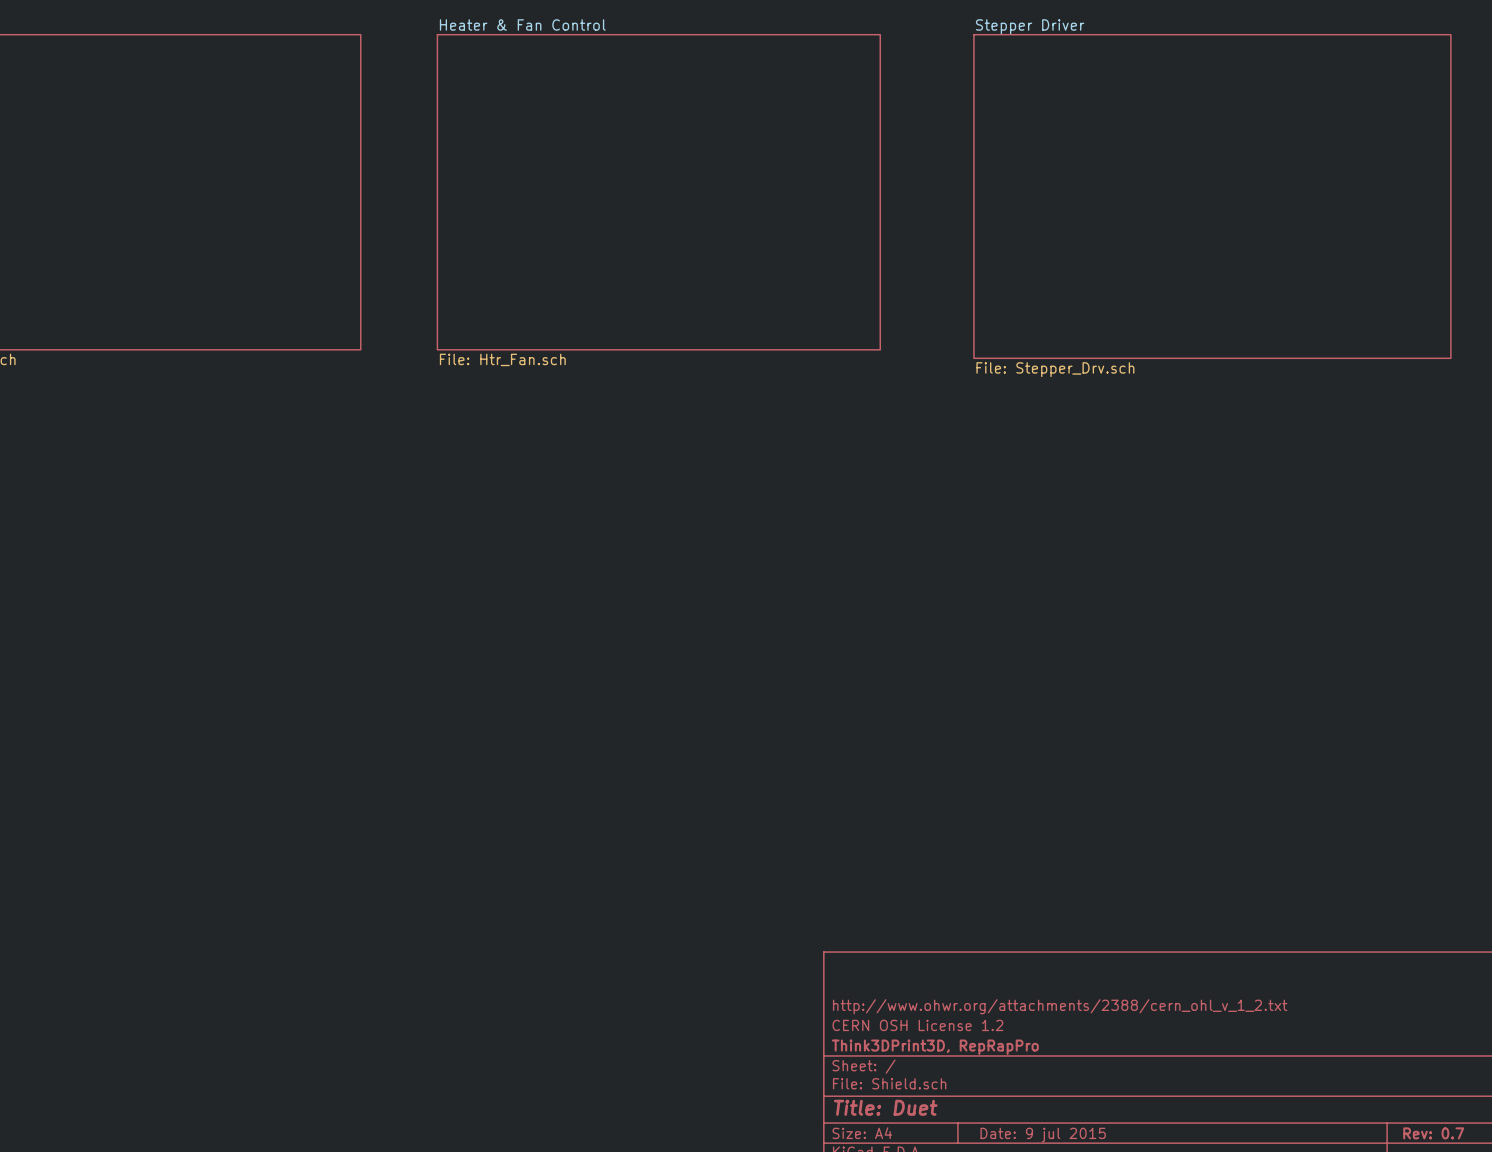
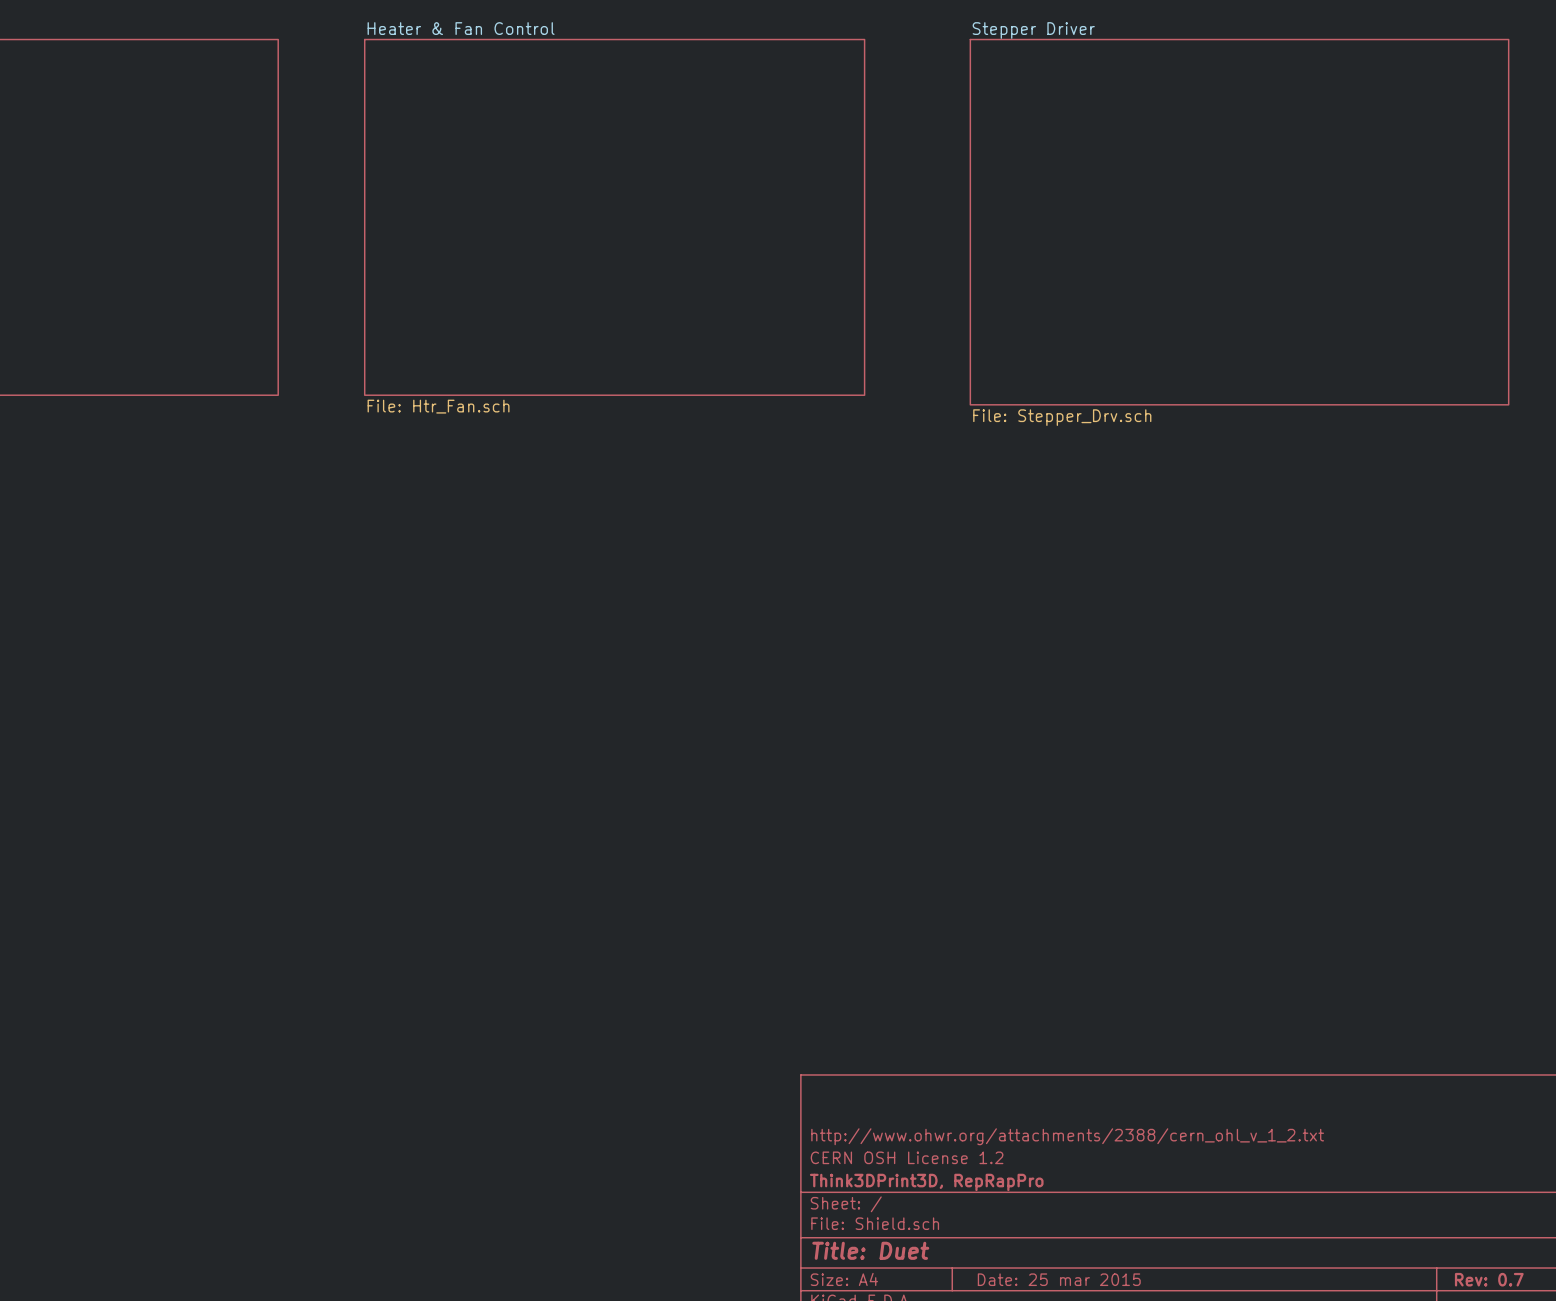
title block: Date: 9 jul 2015 (1043, 1135) -> Date: 25 mar 2015 (1059, 1279)

